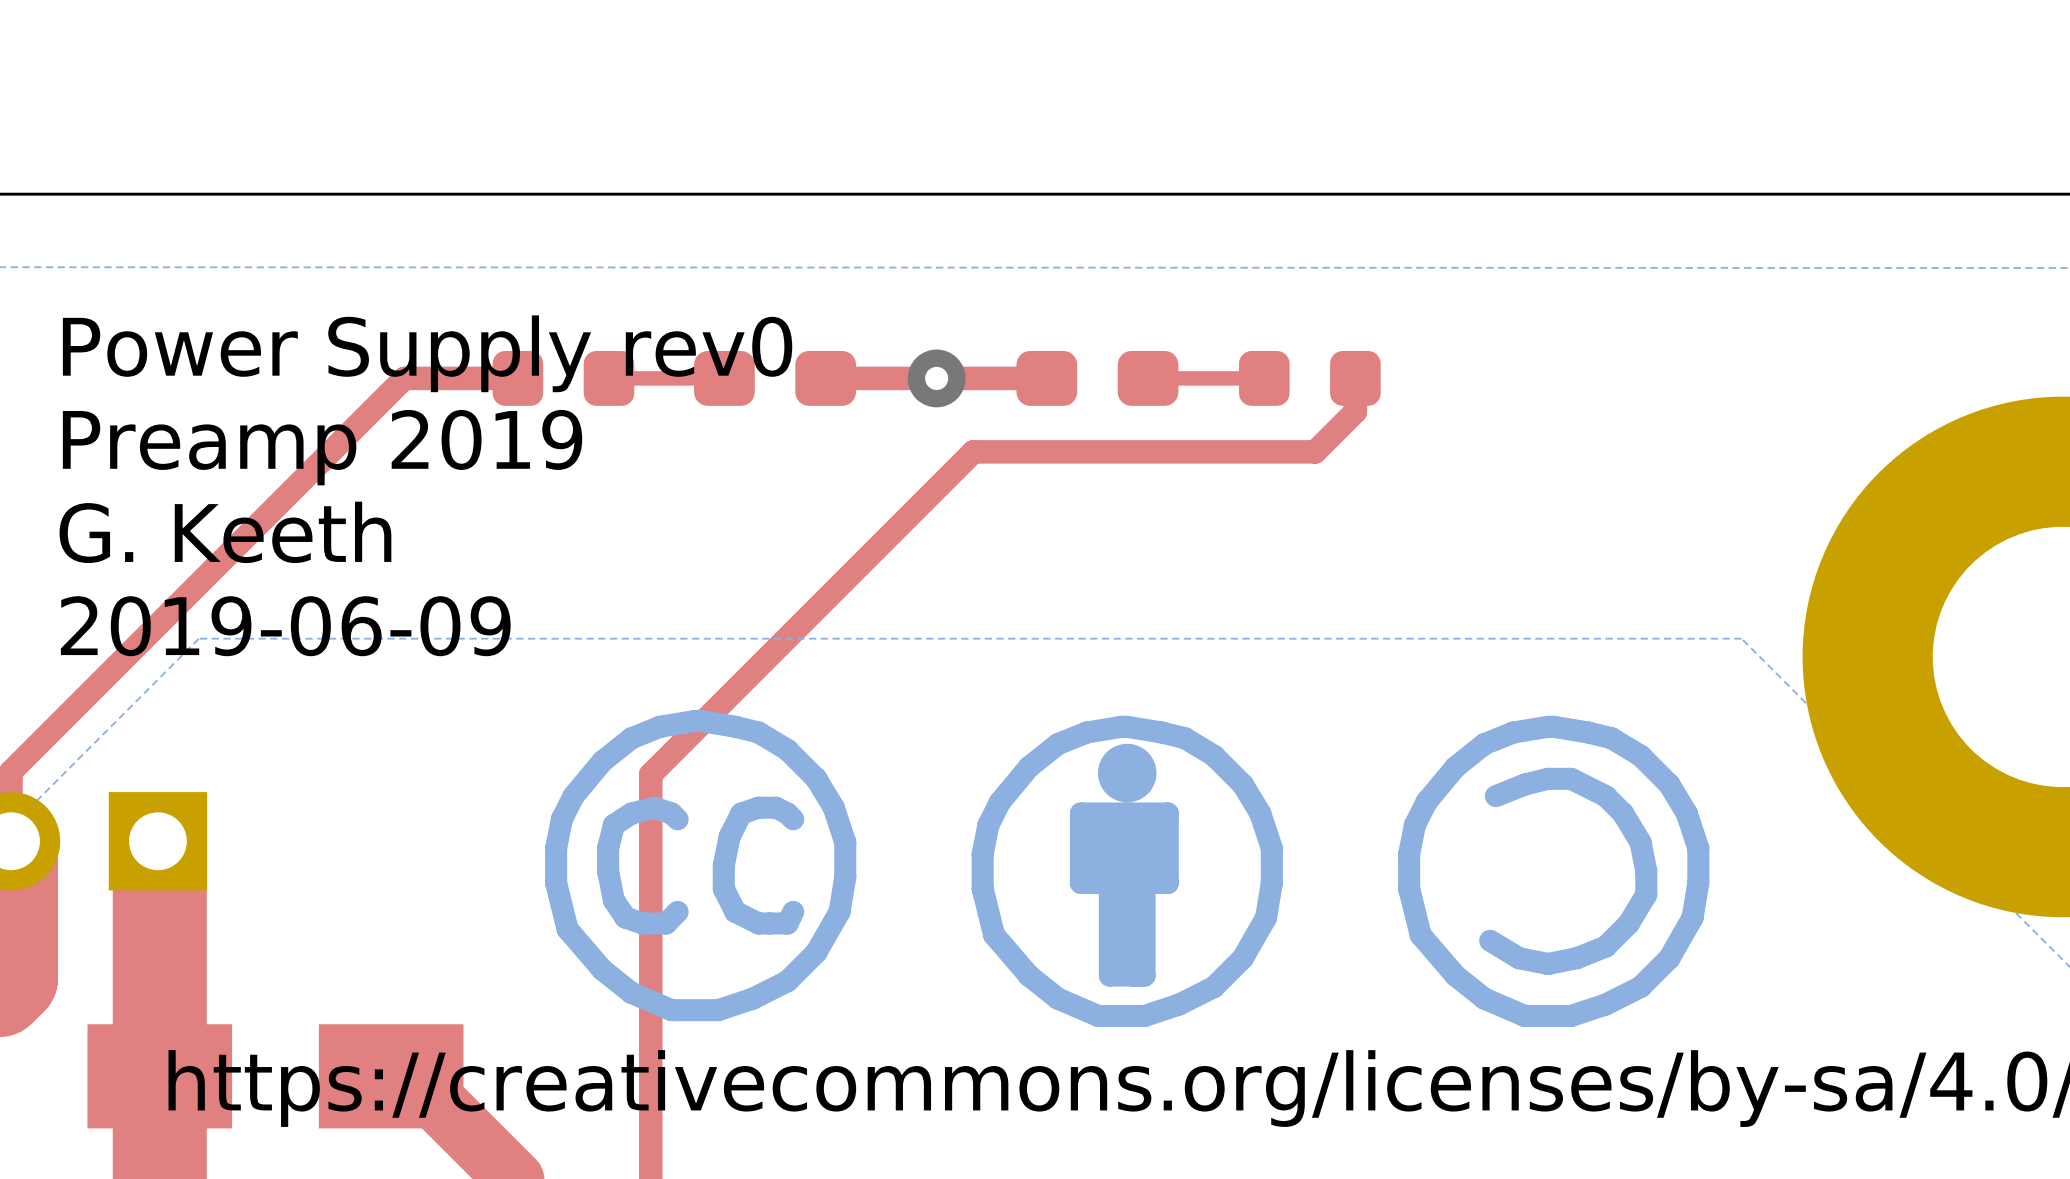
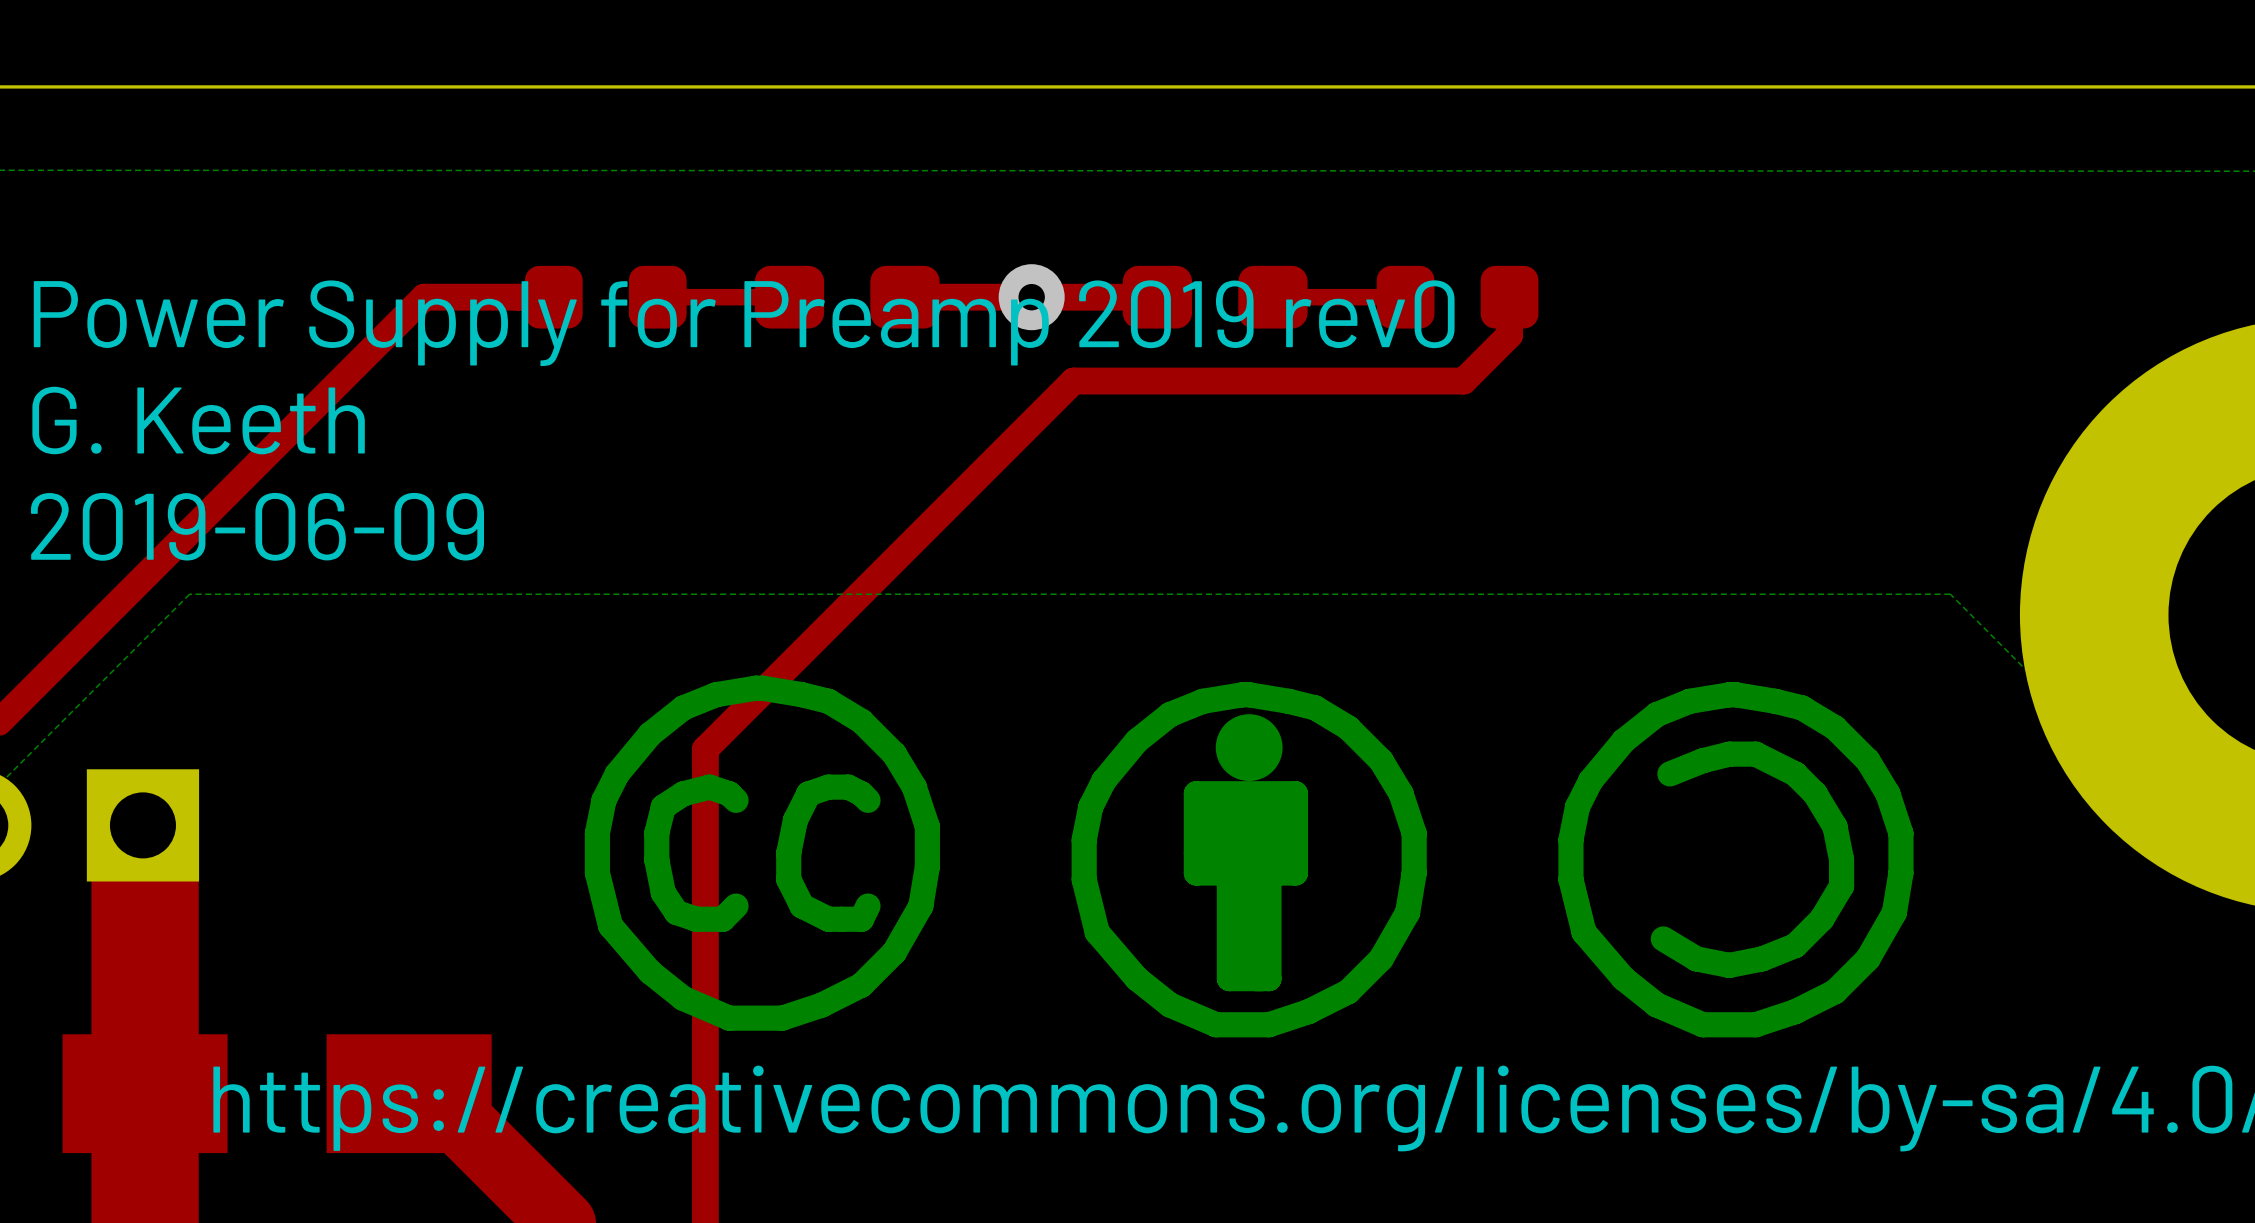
text: Power Supply rev0 (427, 353) -> Power Supply for Preamp 2019 rev0 (744, 323)
text: Preamp 2019 (322, 447) -> none
text position: G. Keeth (225, 532) -> G. Keeth (198, 420)
text position: 2019-06-09 (285, 626) -> 2019-06-09 (257, 526)

